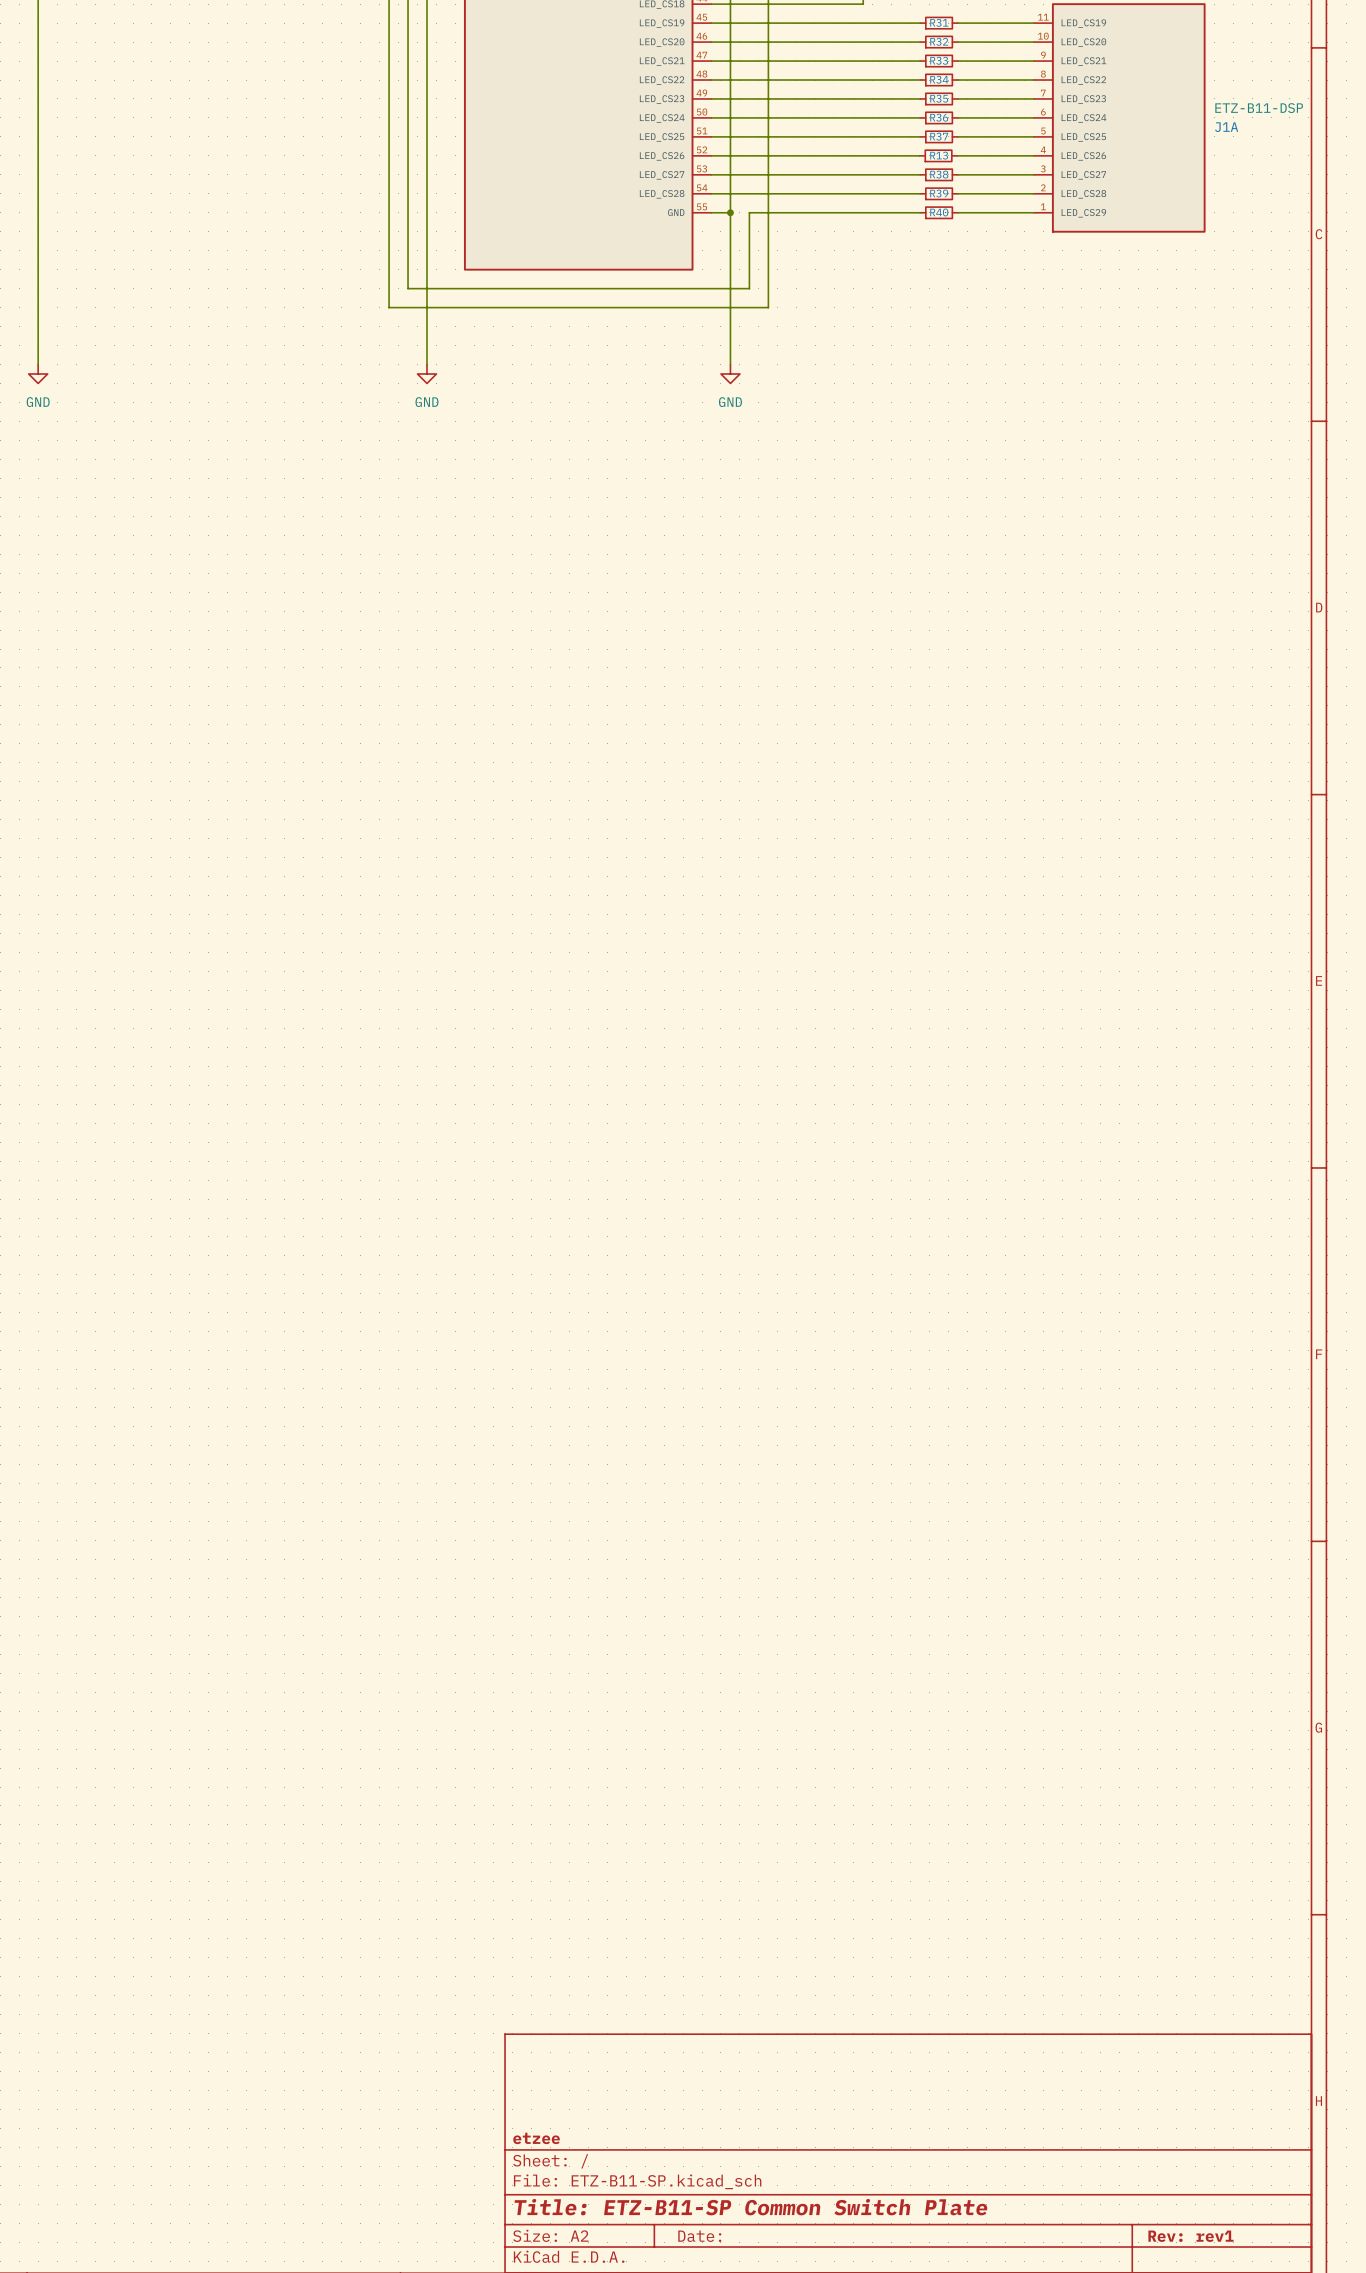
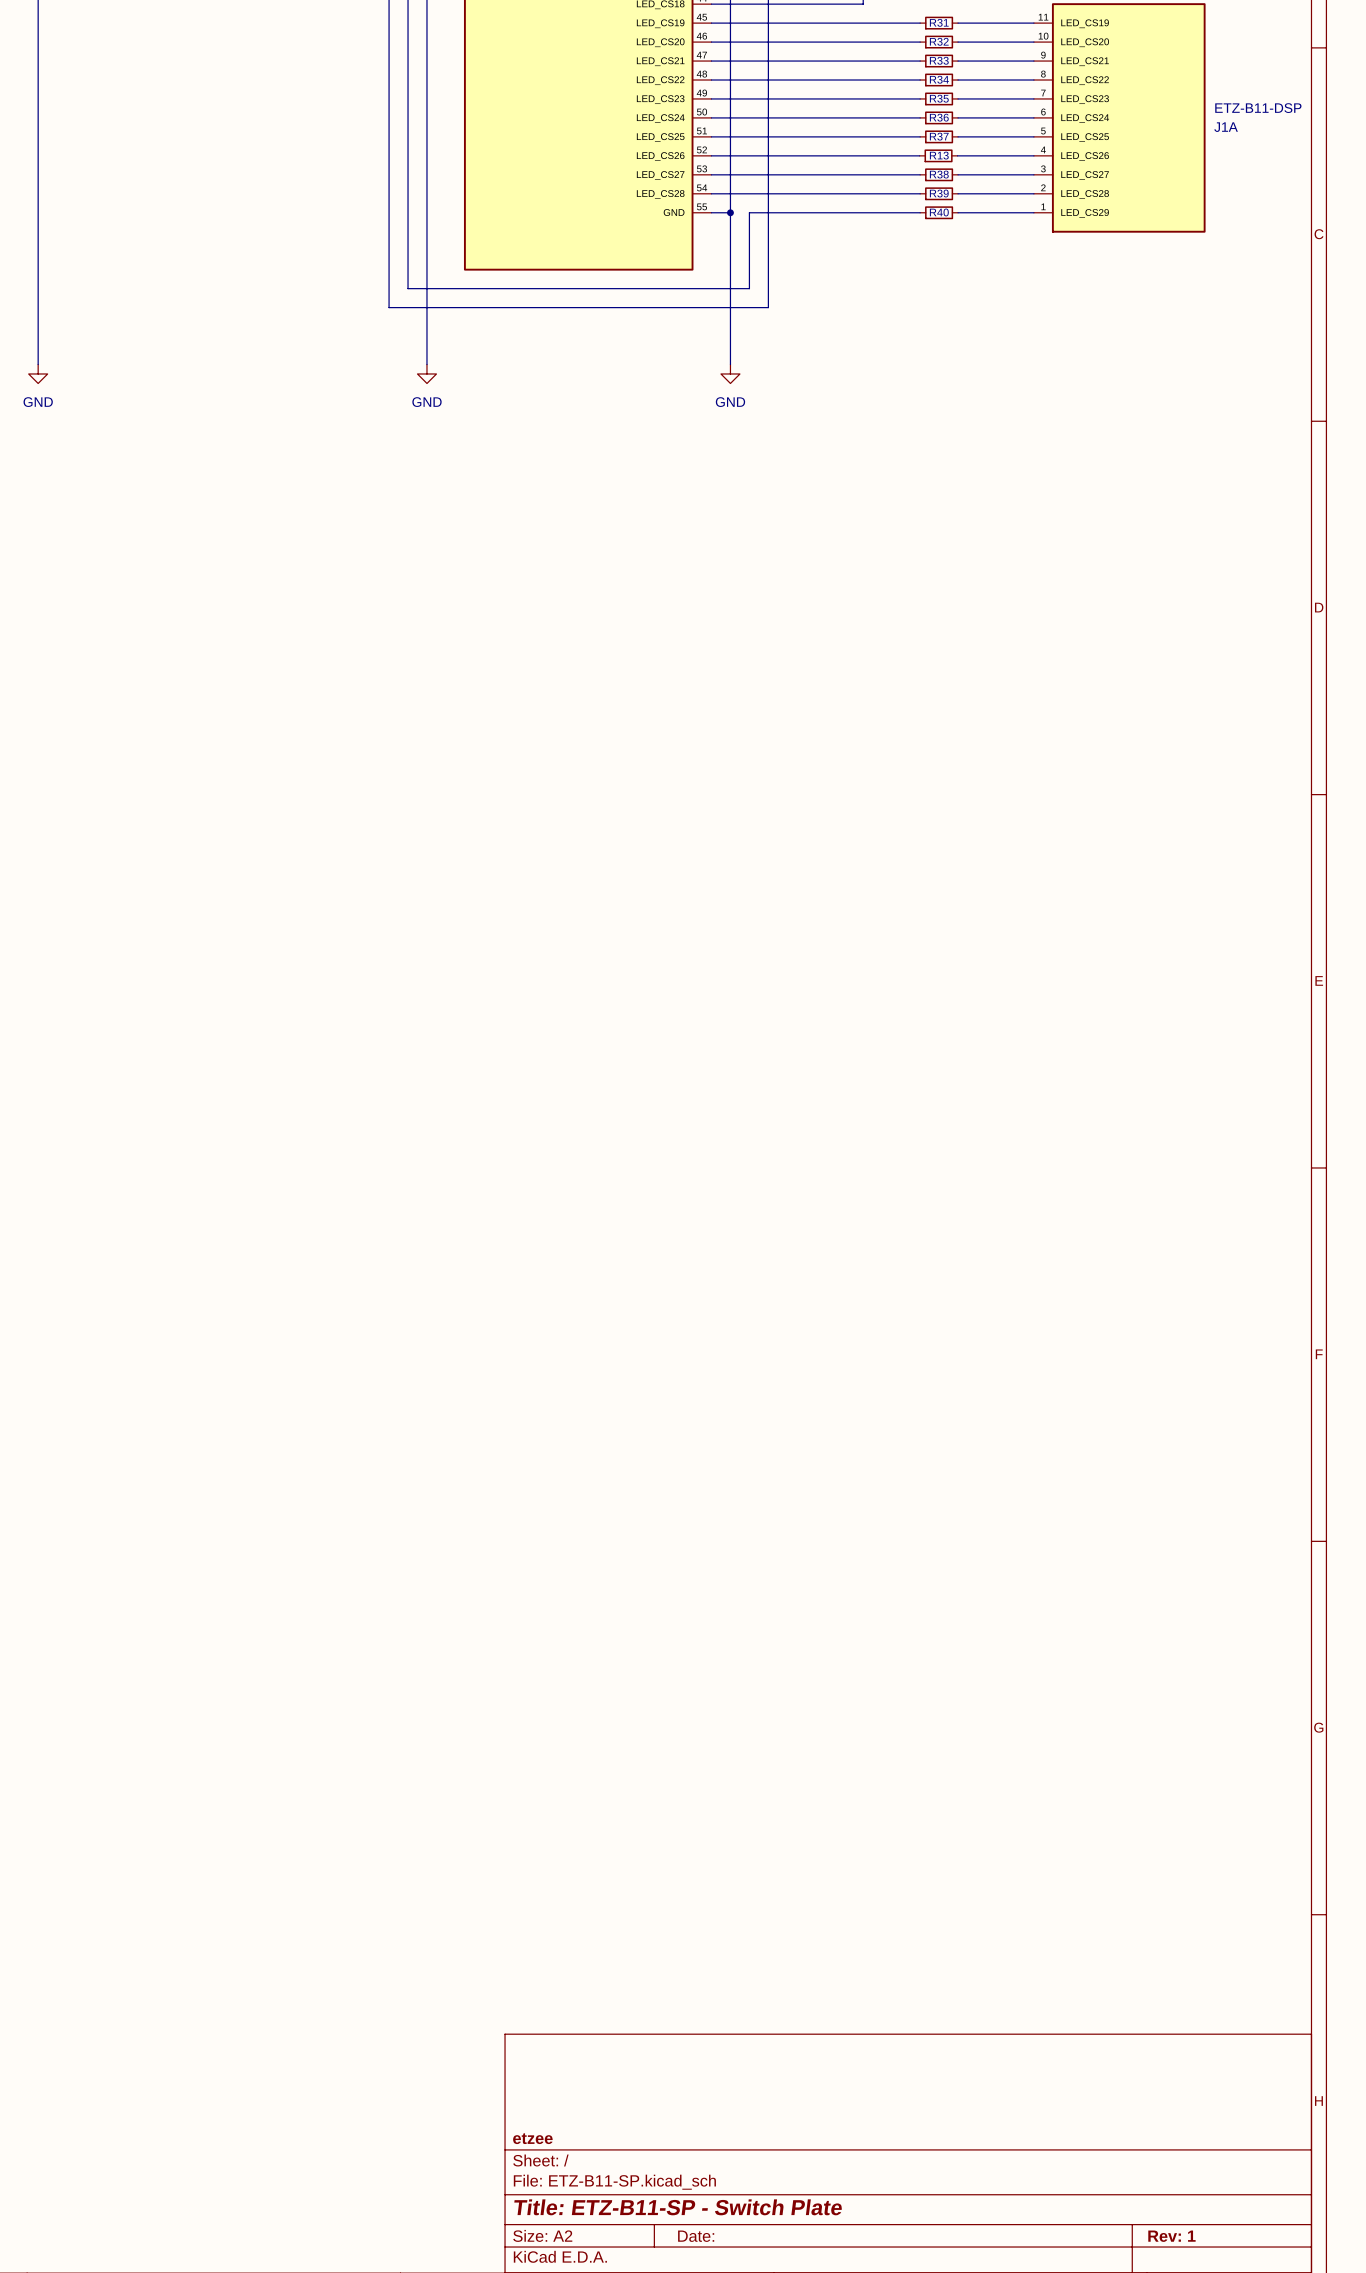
title block: Title: ETZ-B11-SP Common Switch Plate (750, 2207) -> Title: ETZ-B11-SP - Switch Plate (678, 2207)
title block: Rev: rev1 (1190, 2236) -> Rev: 1 (1171, 2236)

